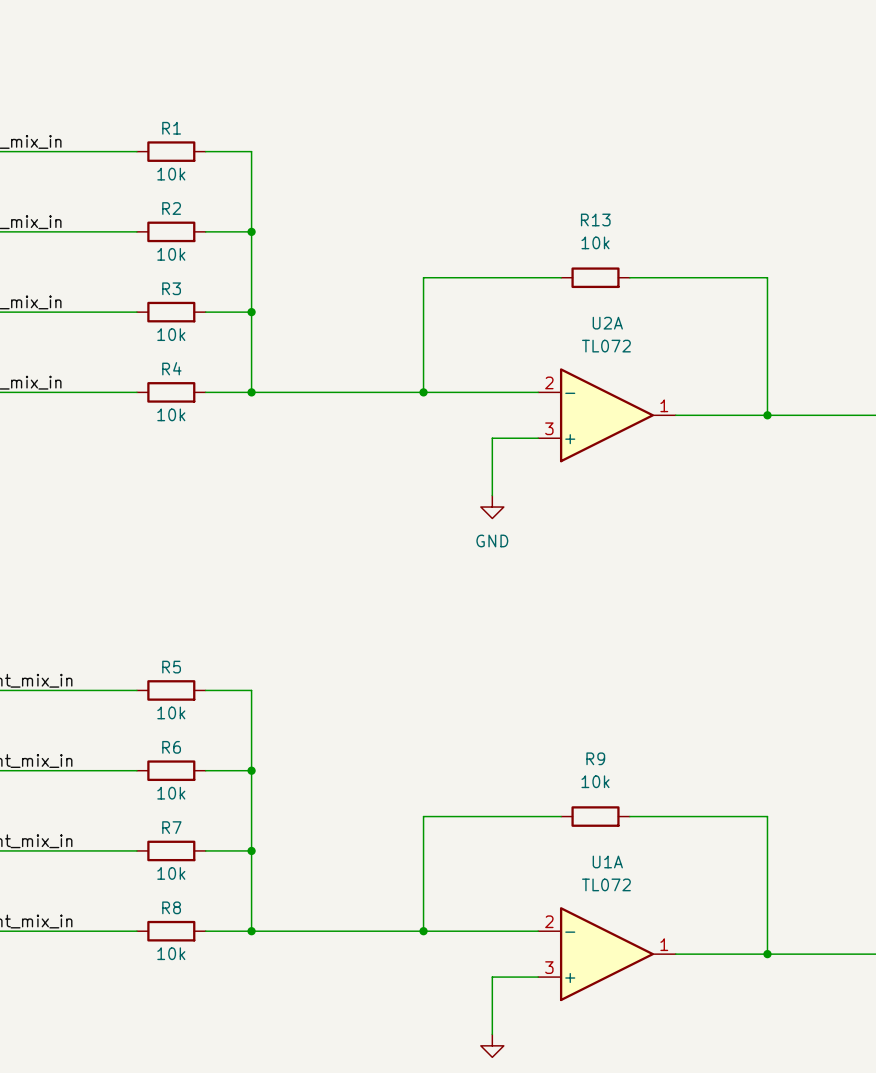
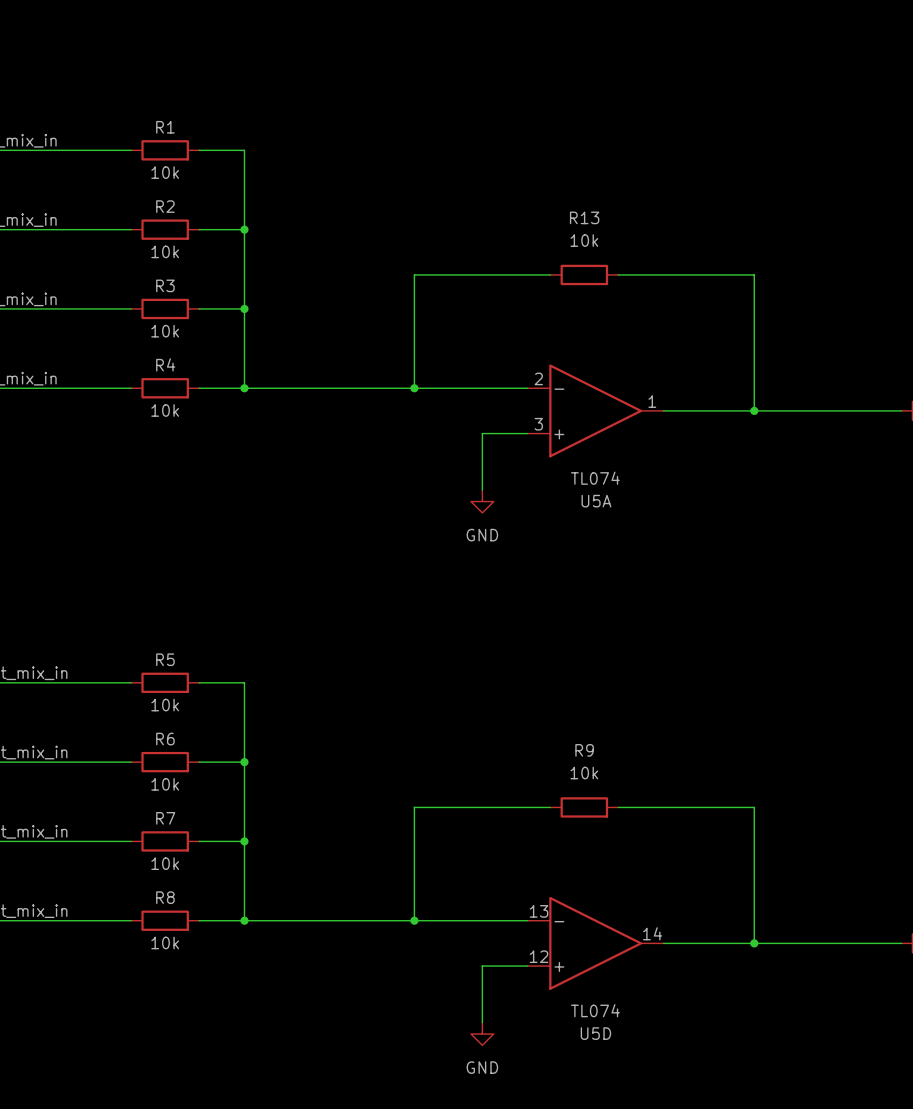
U2A name: U2A (607, 323) -> U5A (596, 501)
U2A value: TL072 (606, 346) -> TL074 (595, 478)
U1A name: U1A (607, 861) -> U5D (595, 1033)
U1A value: TL072 (606, 884) -> TL074 (595, 1010)
U1A pin number: 2 (549, 921) -> 13 (539, 911)
U1A pin number: 1 (664, 944) -> 14 (652, 933)
U1A pin number: 3 (549, 967) -> 12 (539, 956)

